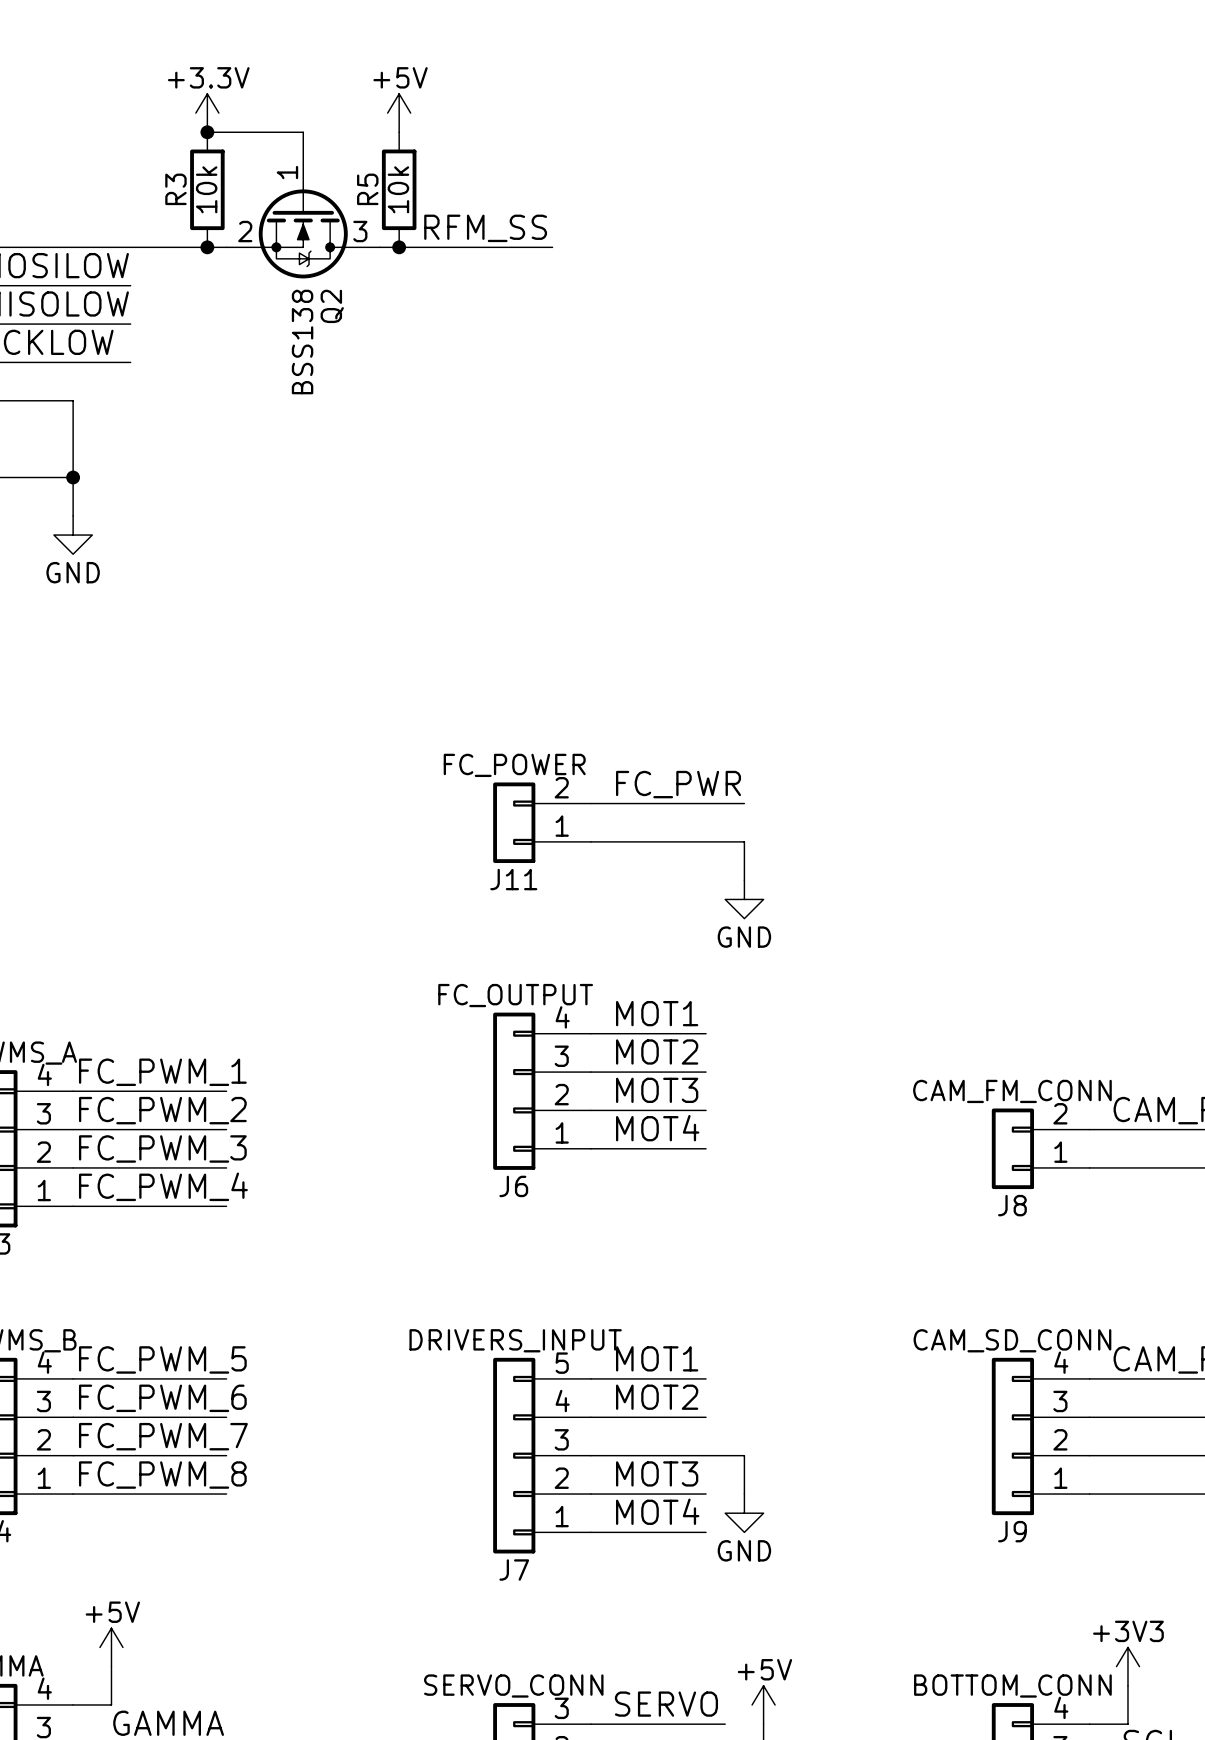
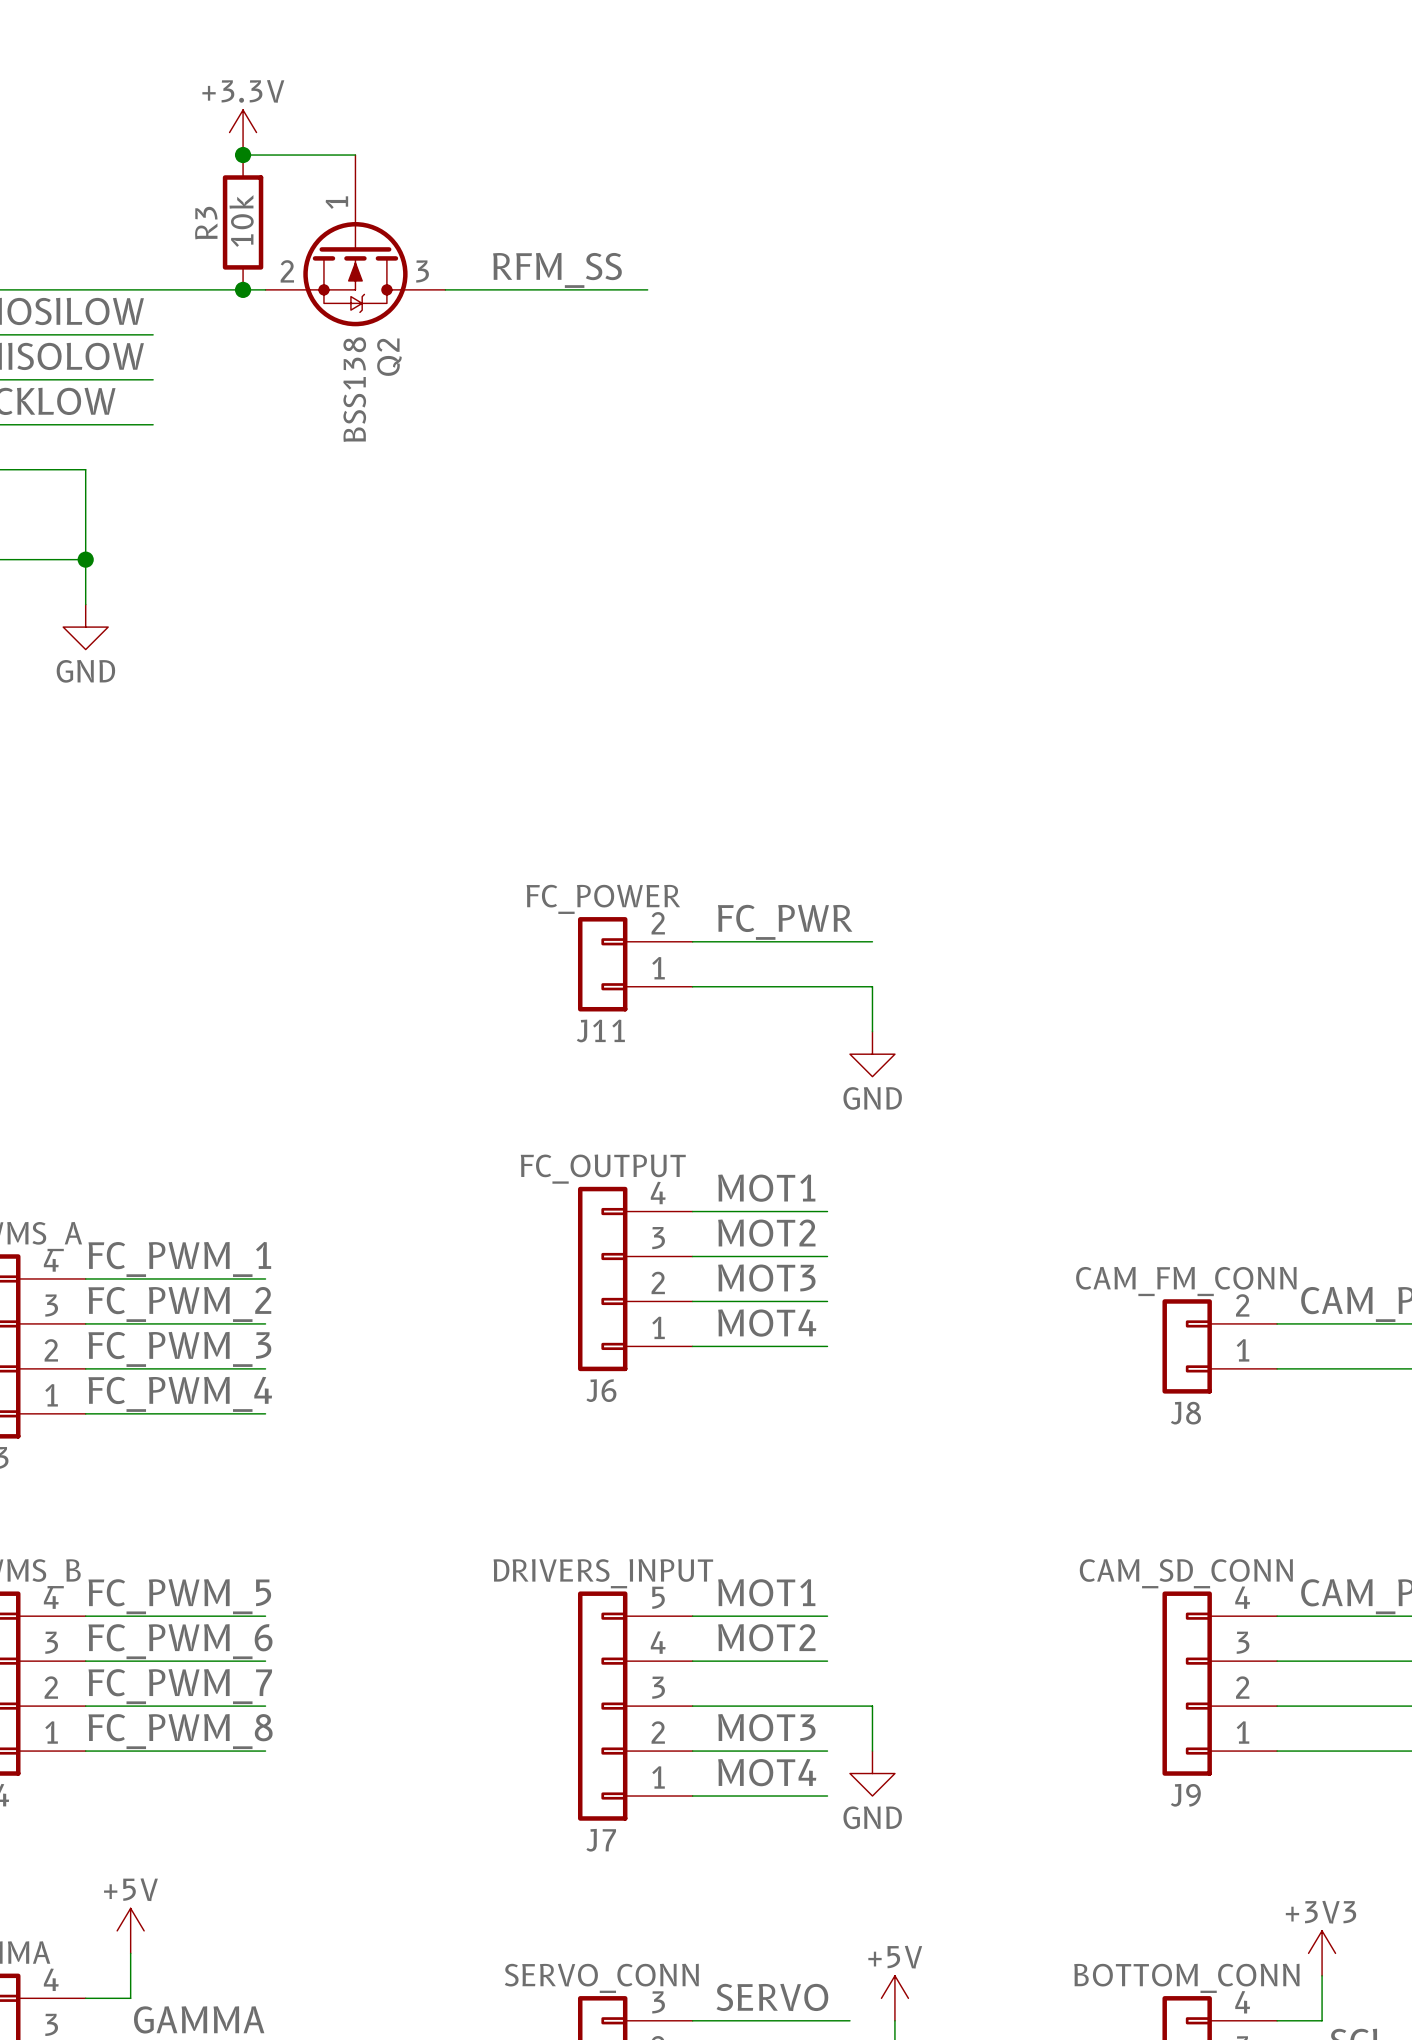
power symbol: +5V (399, 113) -> none
R5: 10k (399, 189) -> none
junction: (399, 247) -> none

